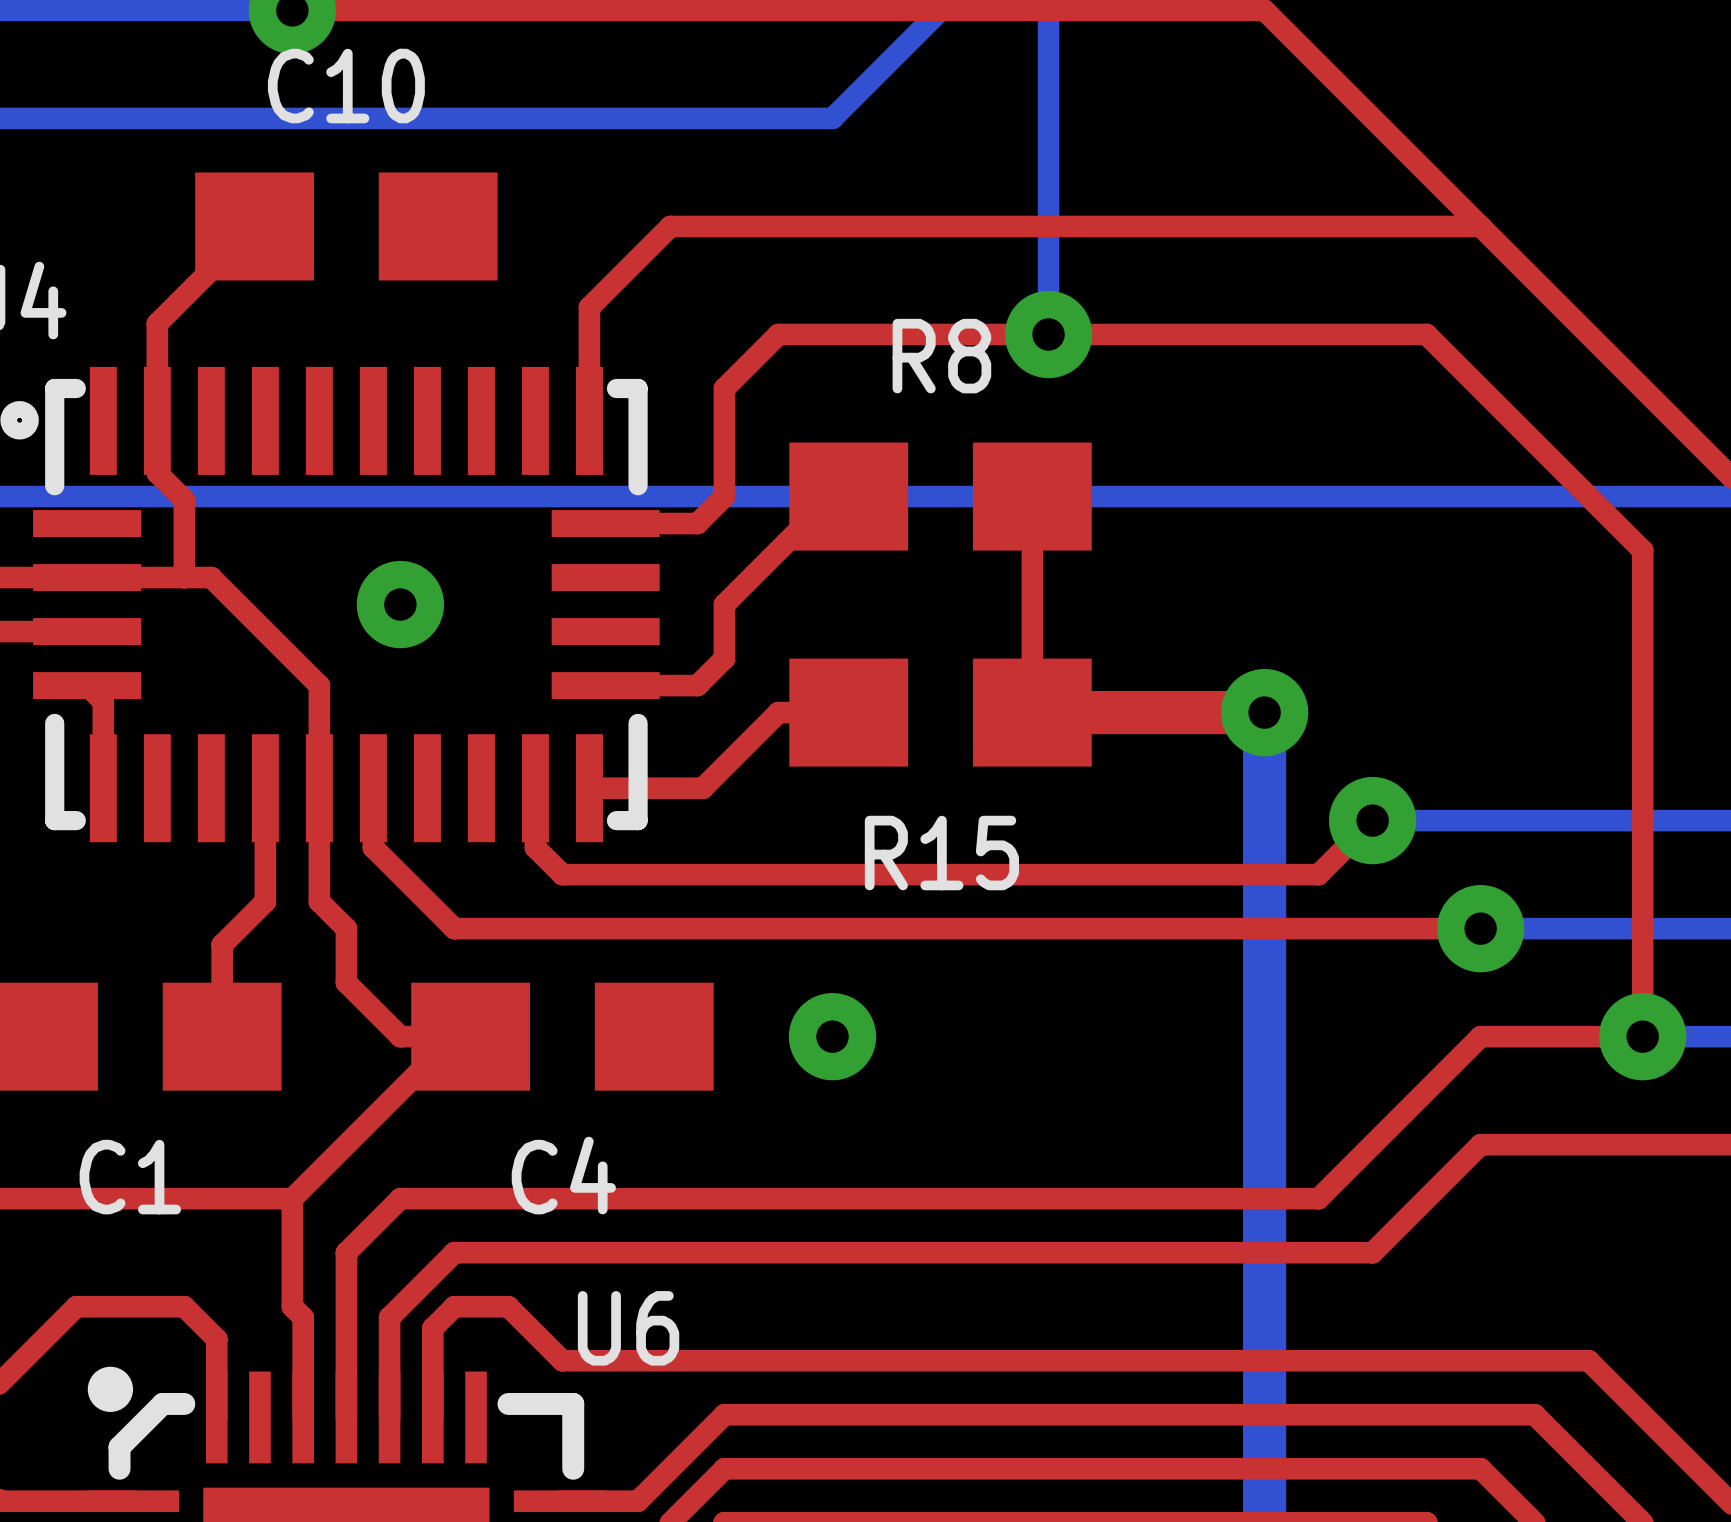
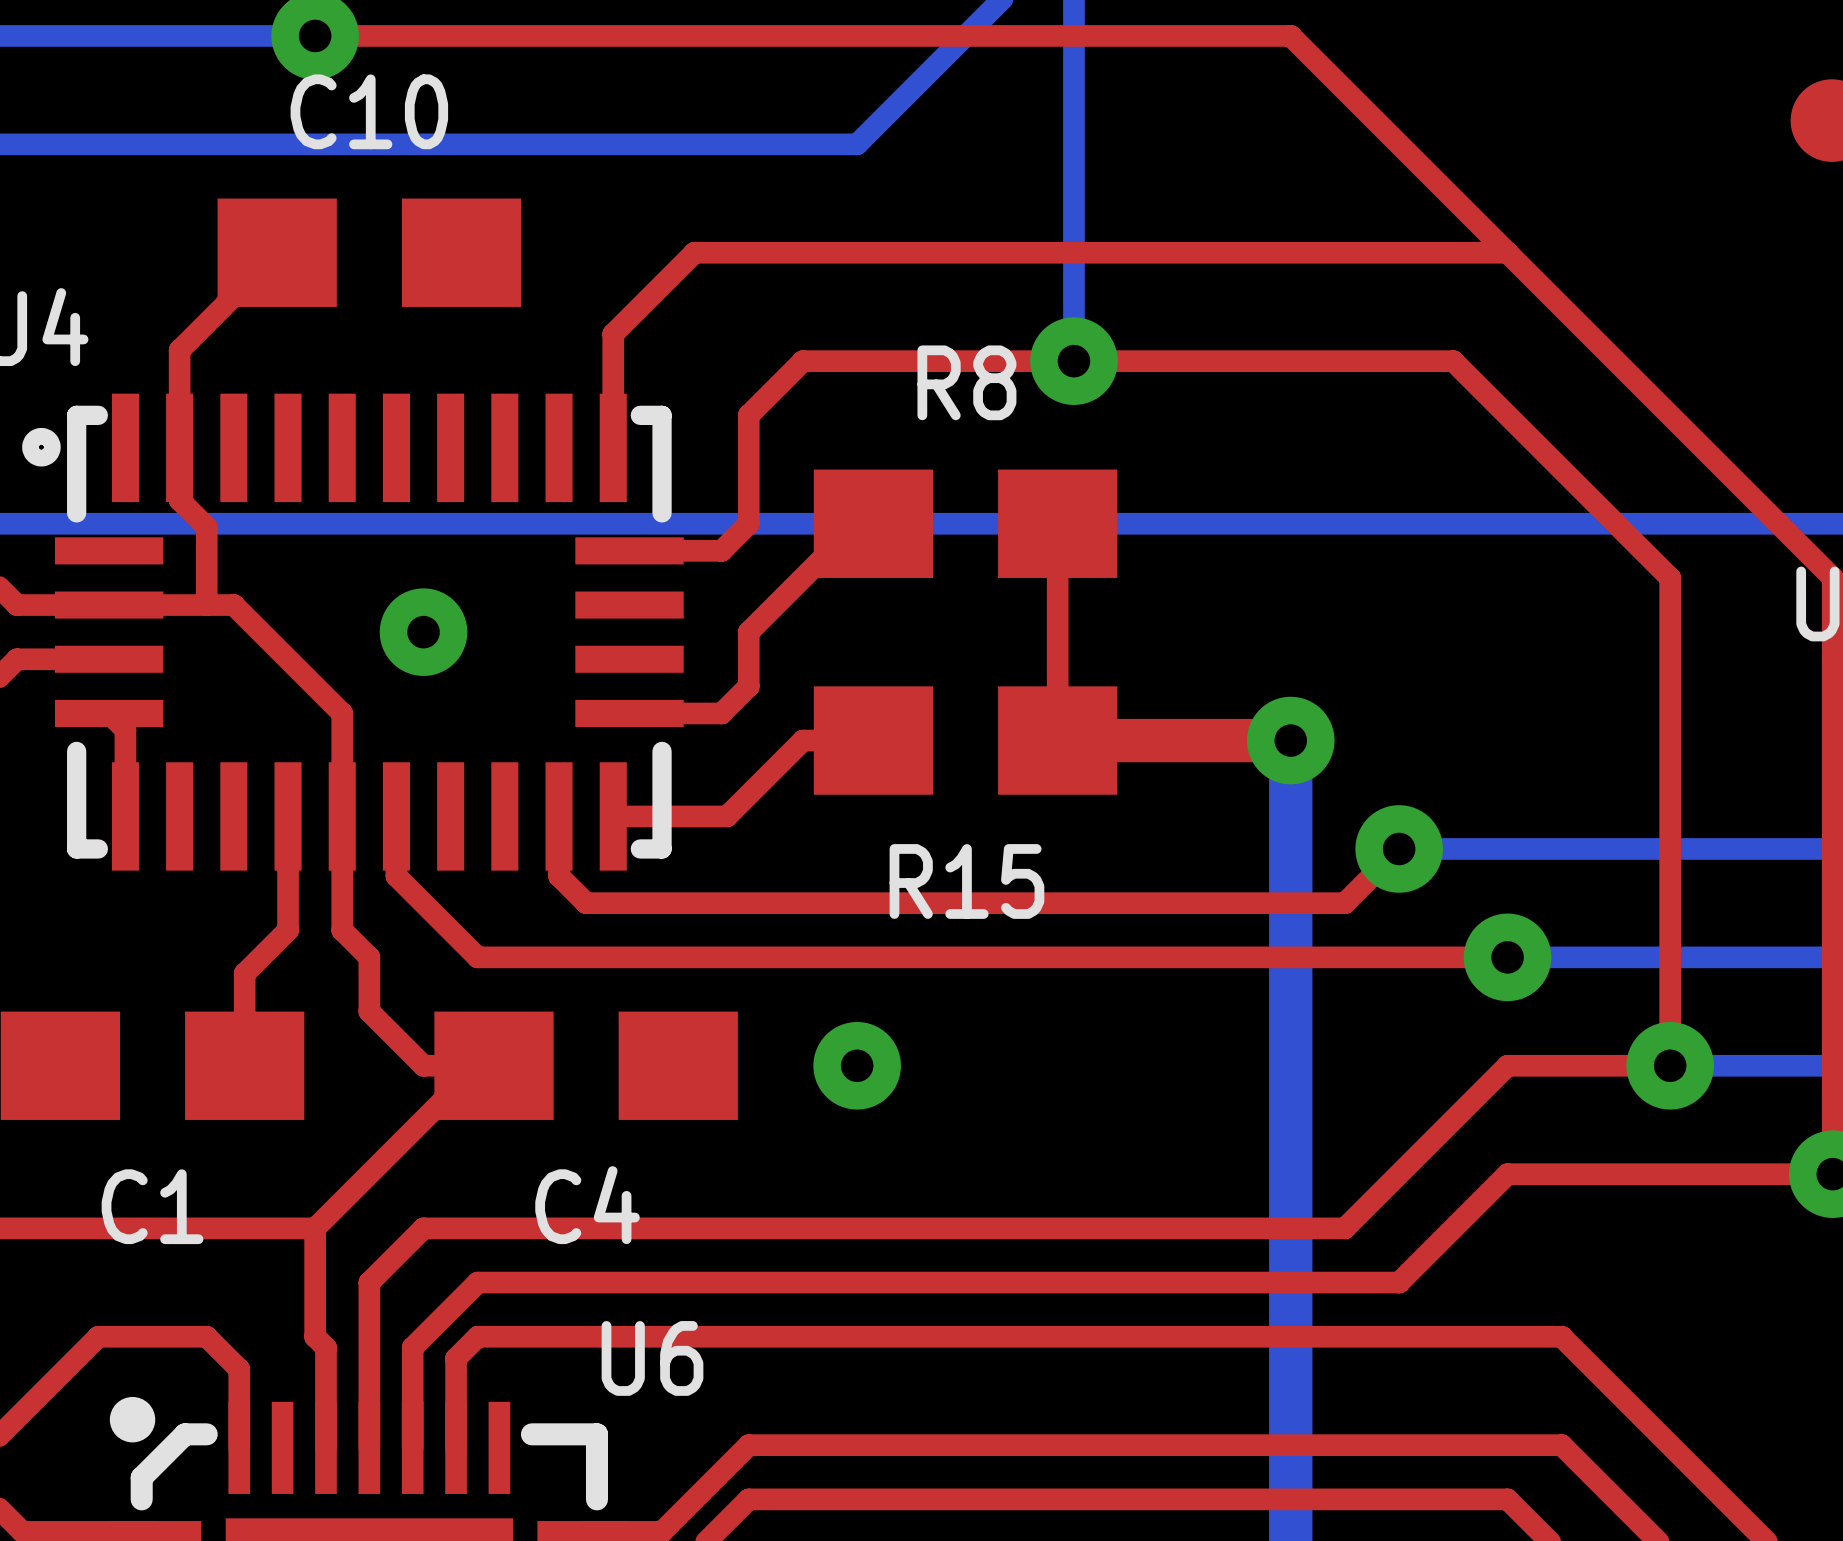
top track: (508, 1306) (562, 1360) (1588, 1360) -> (531, 1336) (1561, 1336) (1615, 1390)

